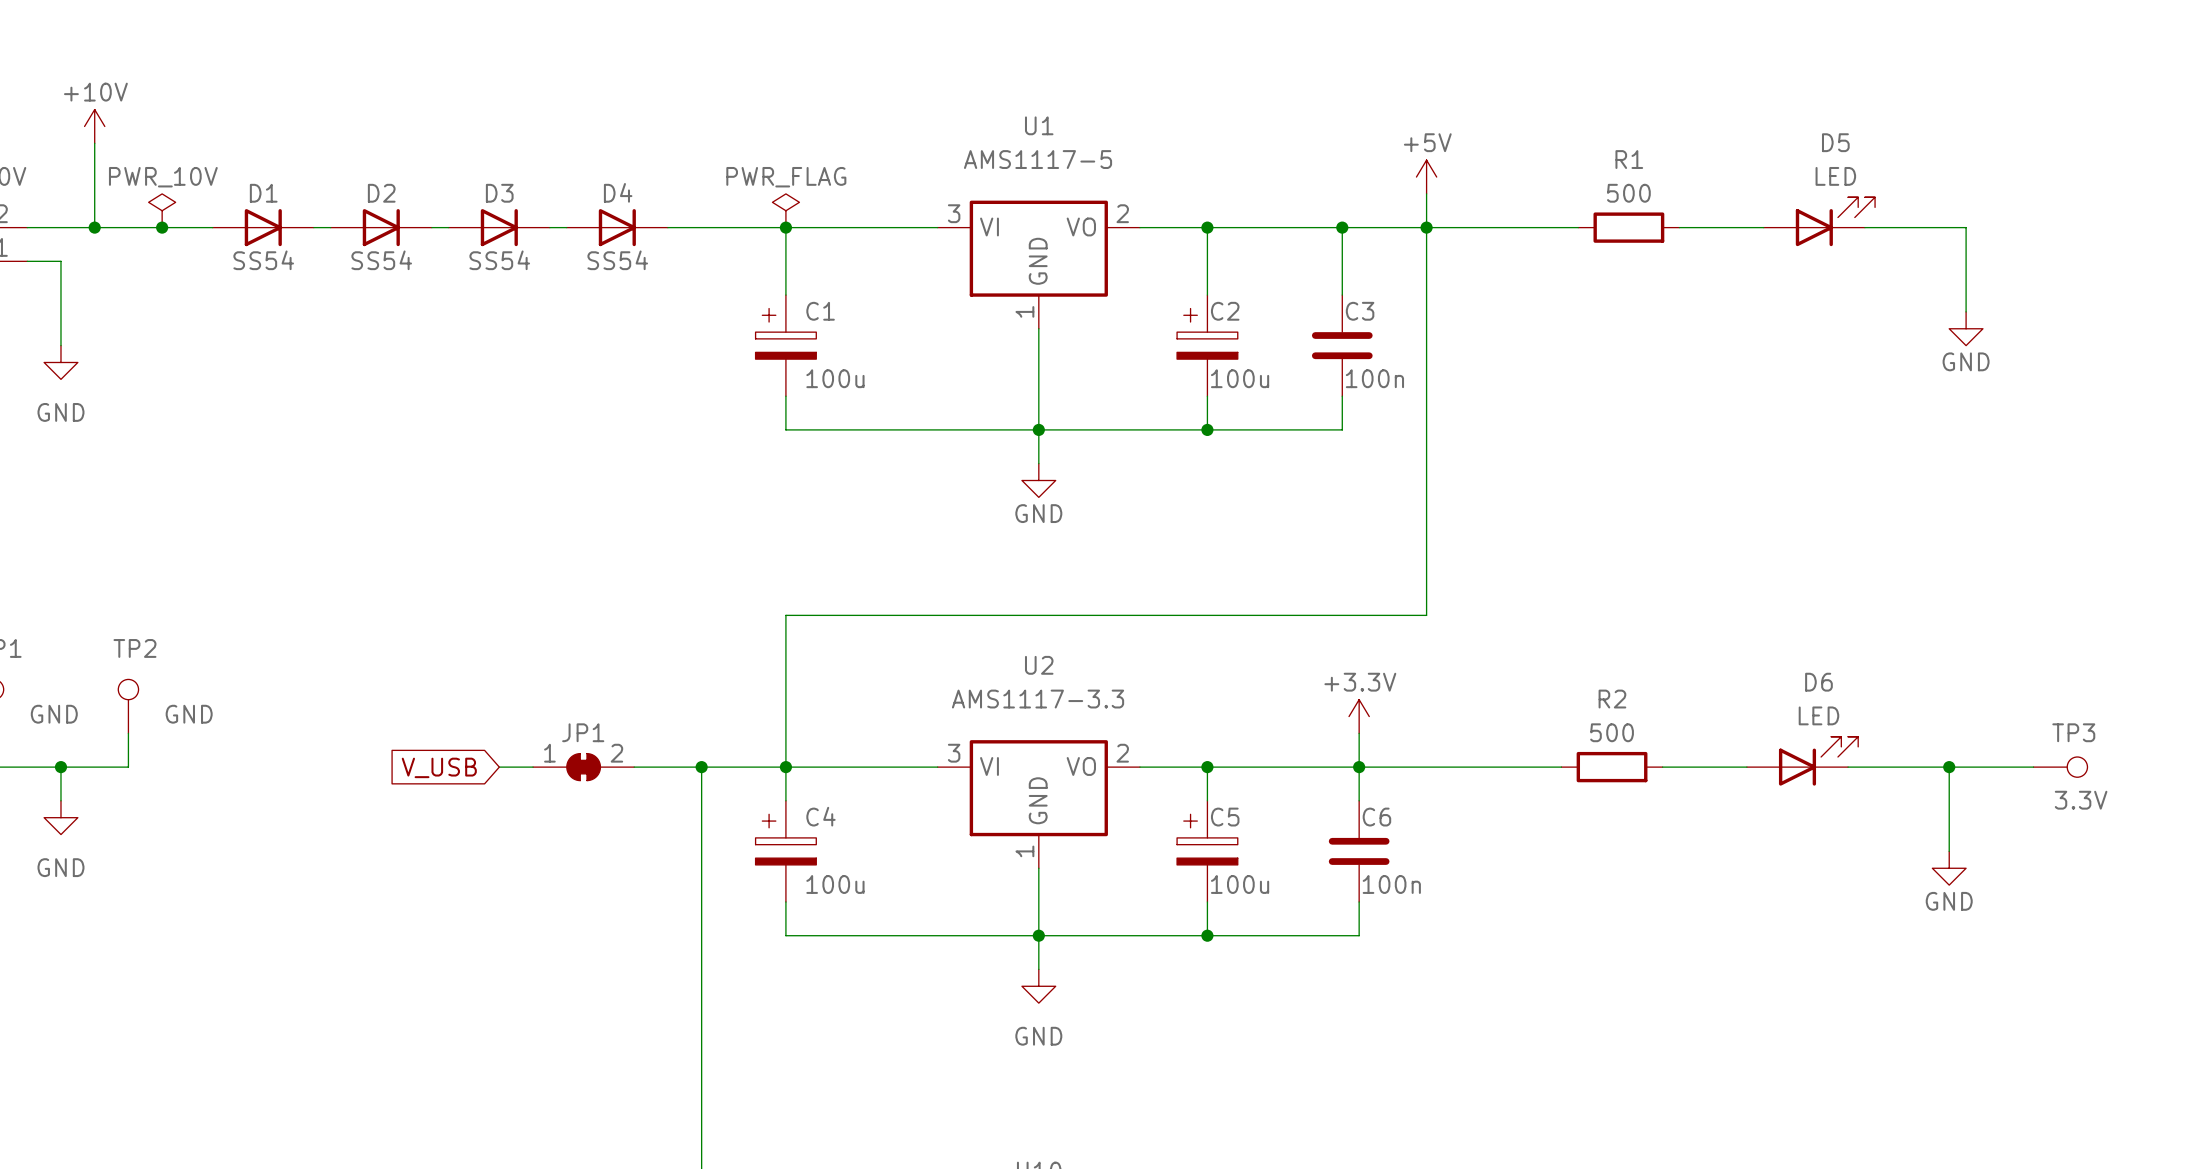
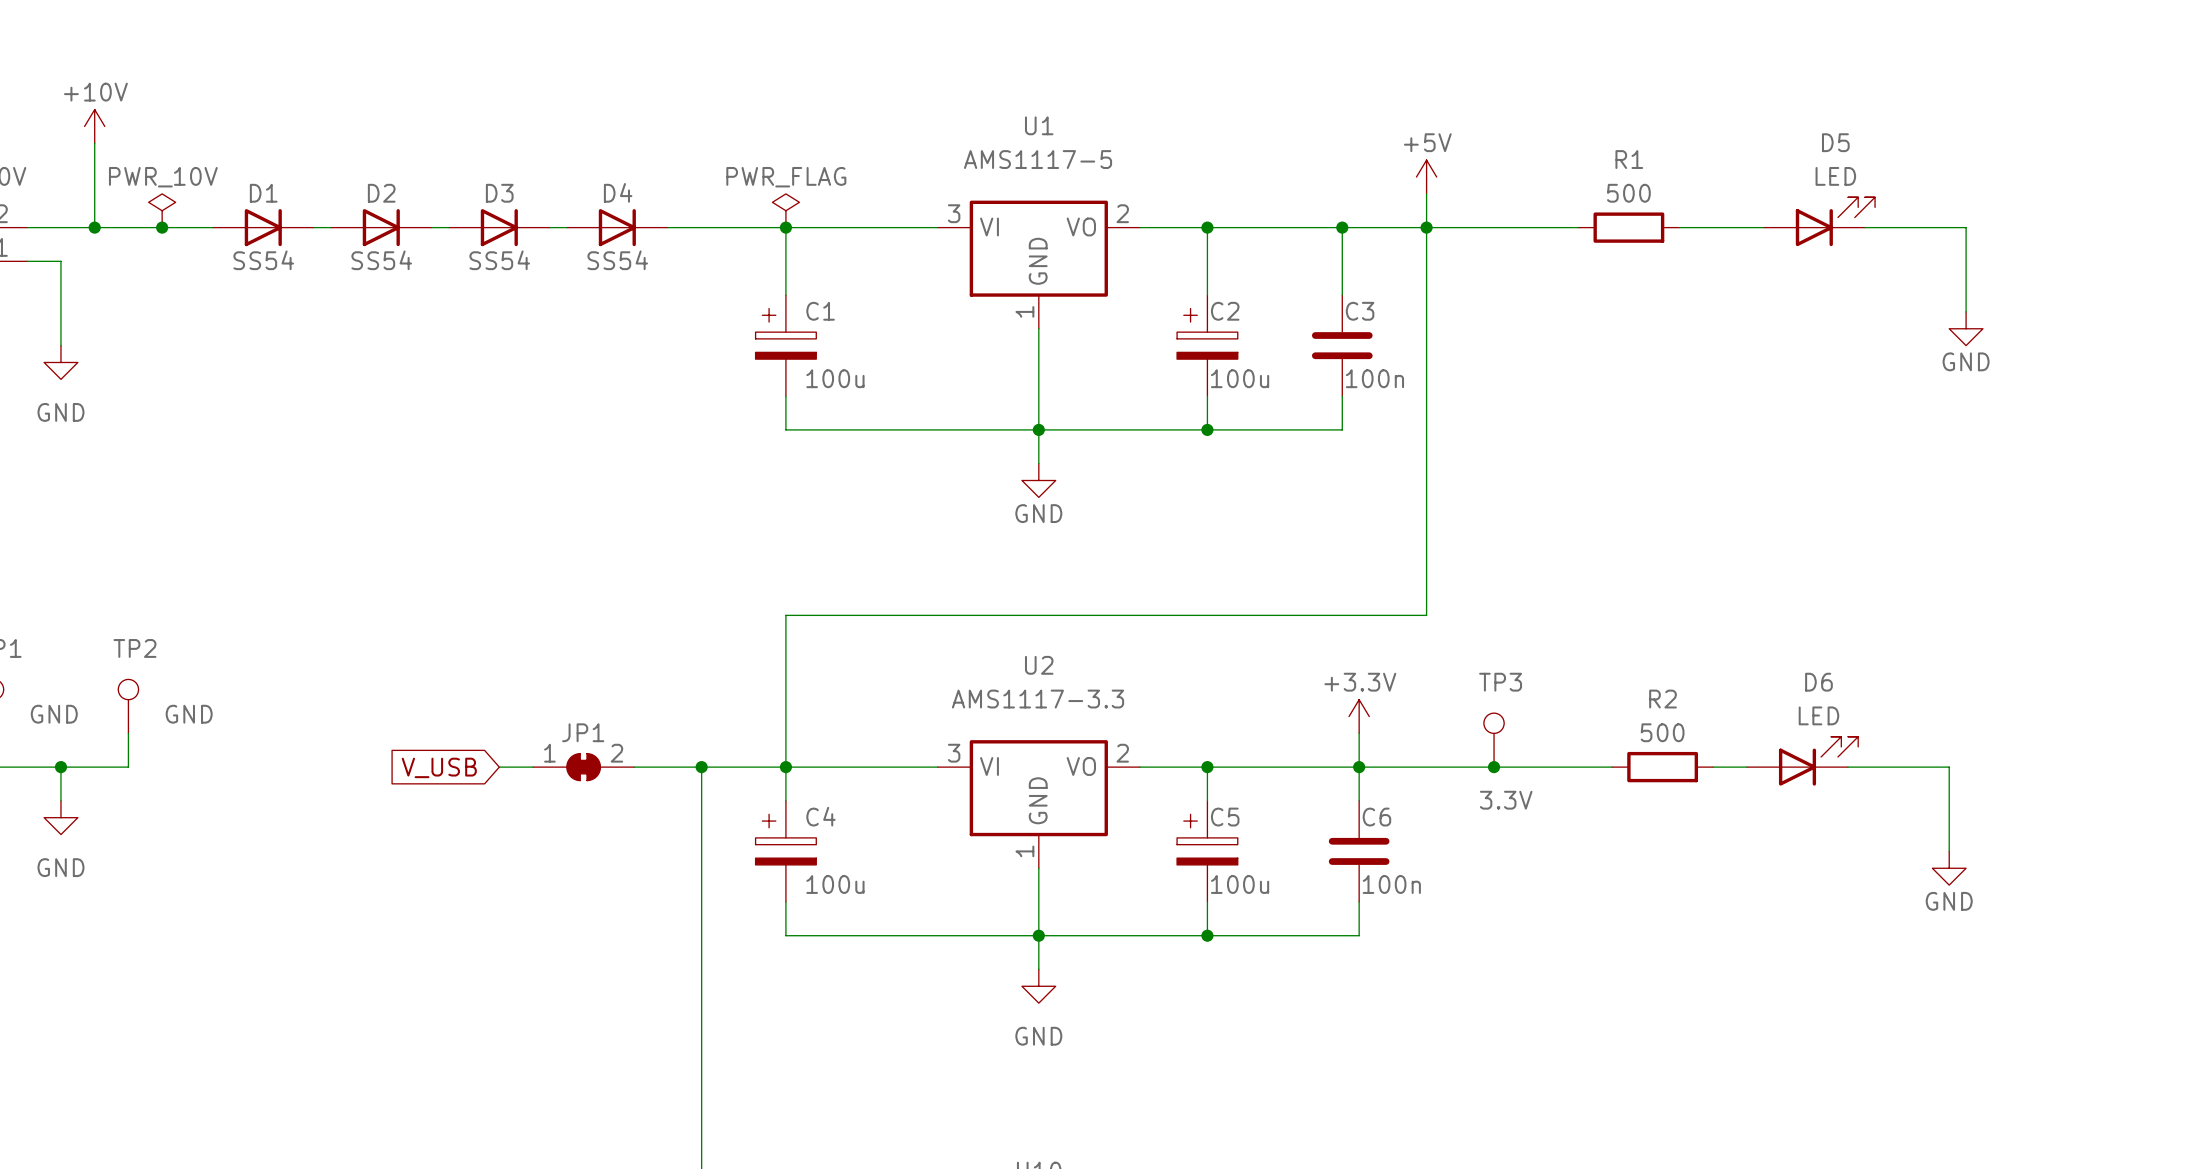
junction: none -> (1494, 767)
R2 position: (1612, 767) -> (1662, 767)
wire: (1662, 767) (1713, 767) -> (1561, 767) (1612, 767)
wire: (1949, 767) (2033, 767) -> none
junction: (1949, 767) -> none
TP3 position: (2060, 767) -> (1494, 740)
TP3 rotation: 0° (2077, 767) -> 90° counterclockwise (1494, 723)
TP3 value position: 3.3V (2081, 800) -> 3.3V (1506, 800)

